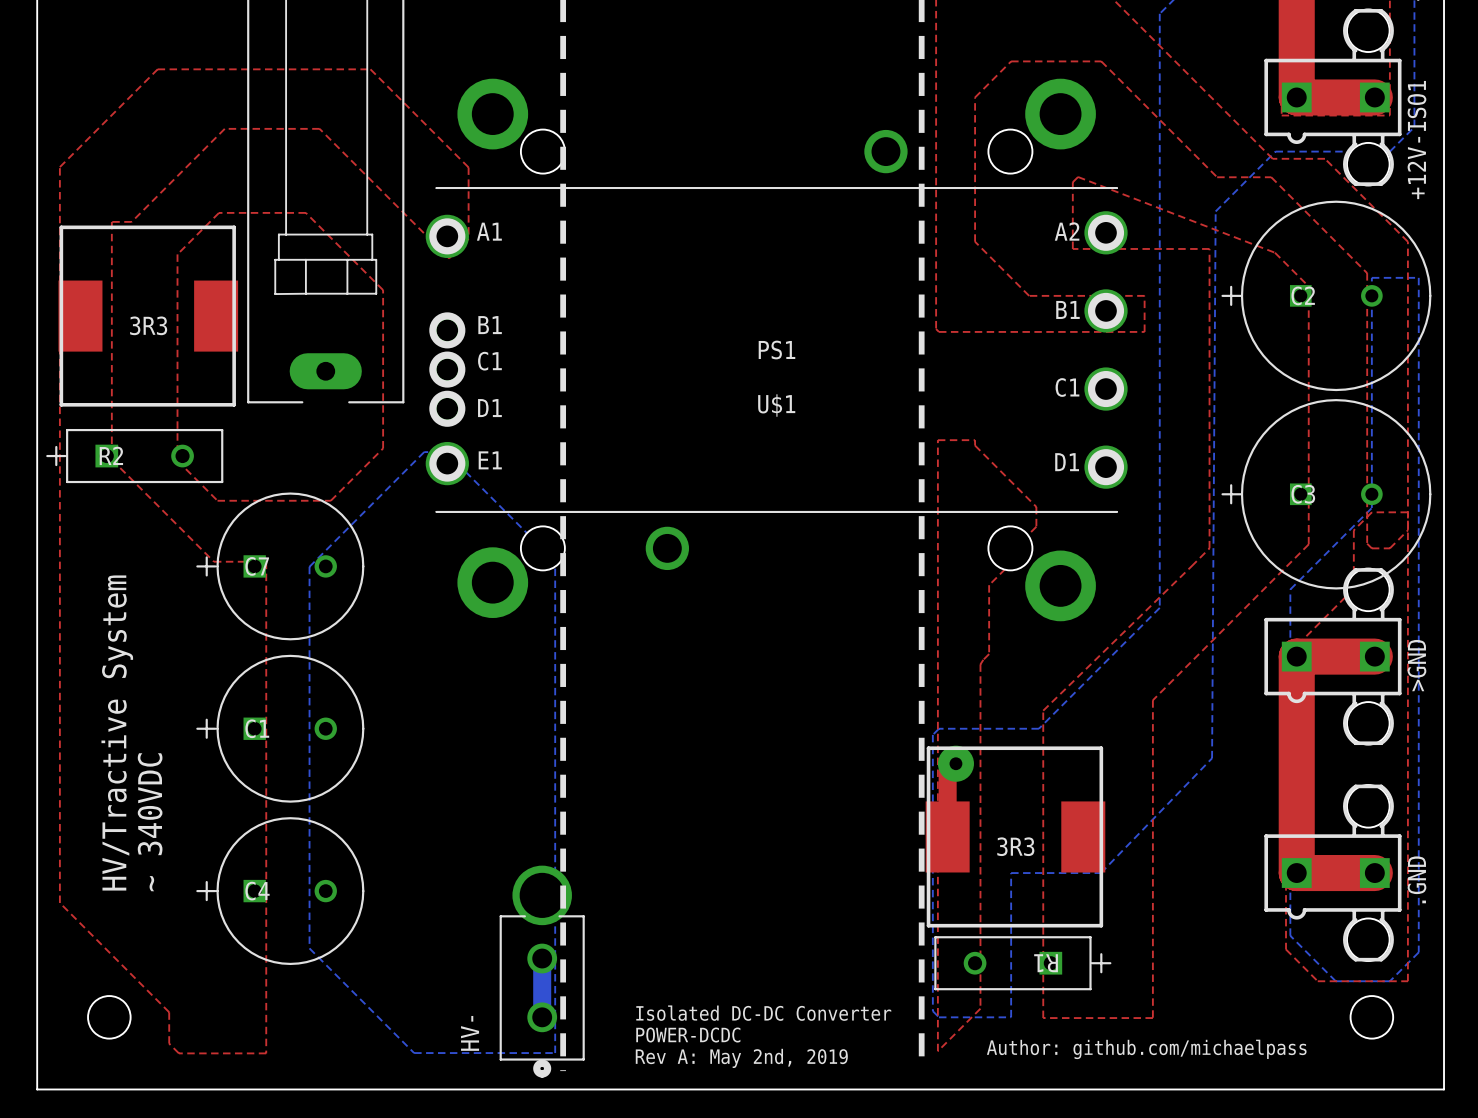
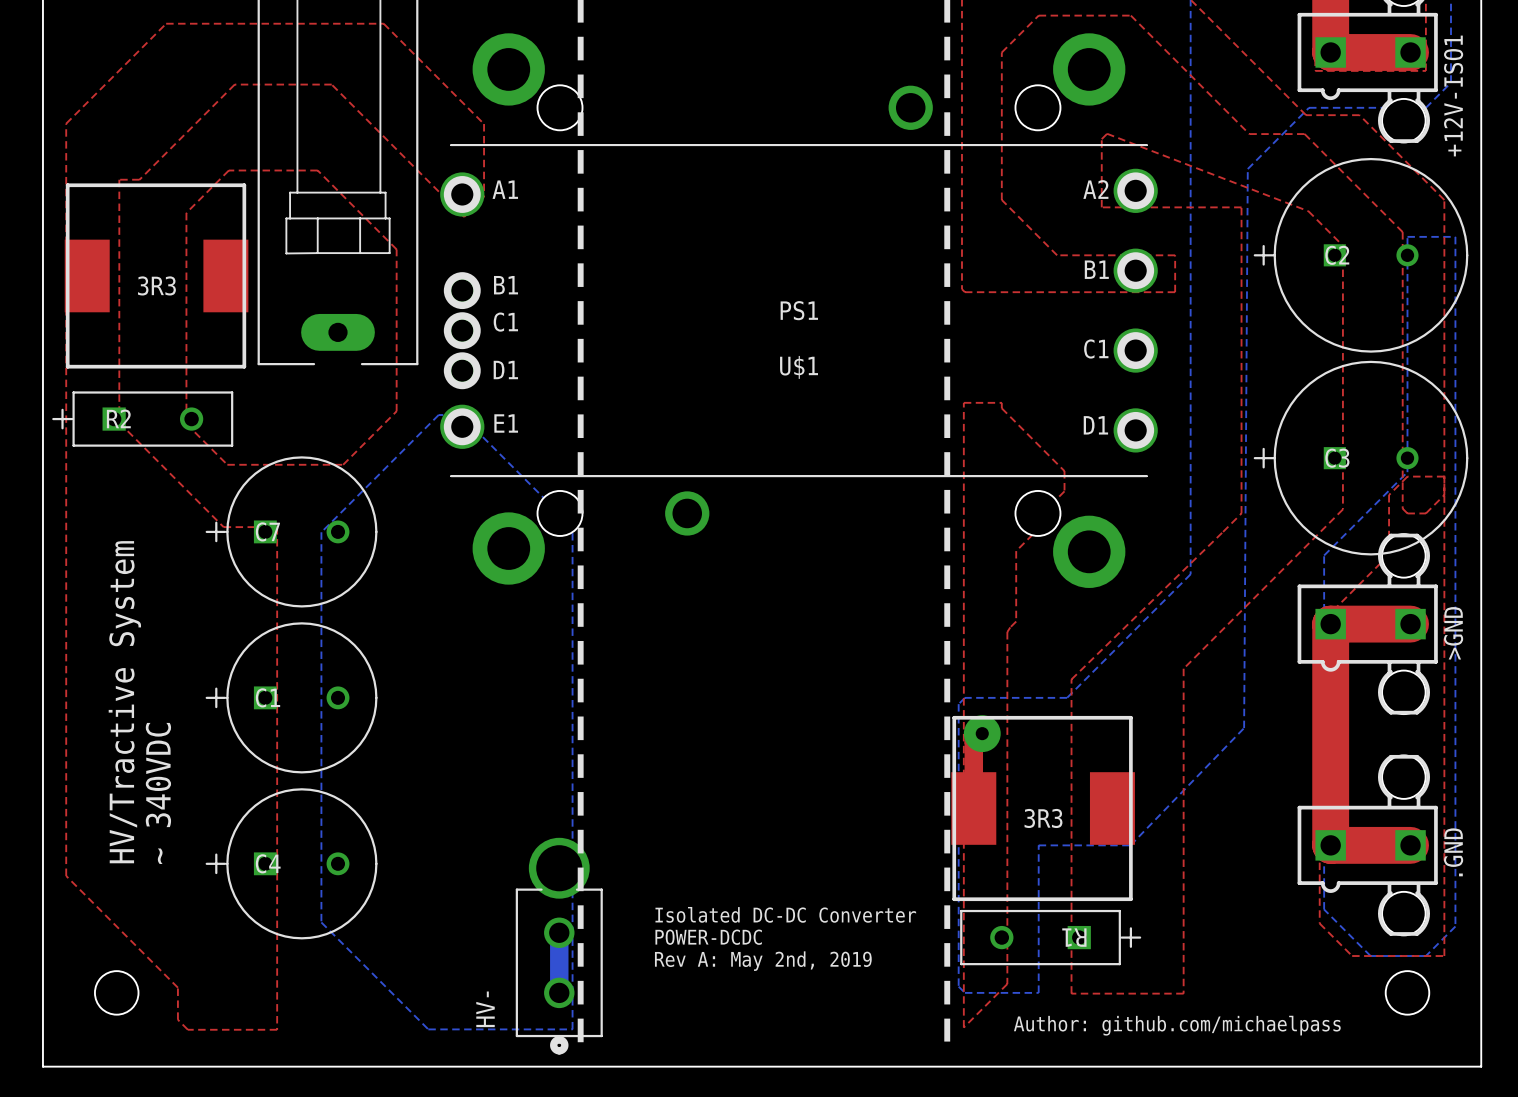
text position: Isolated DC-DC Converter (763, 1013) -> Isolated DC-DC Converter (785, 914)
text position: POWER-DCDC (688, 1035) -> POWER-DCDC (708, 937)
text position: Rev A: May 2nd, 2019 (741, 1058) -> Rev A: May 2nd, 2019 (763, 961)

